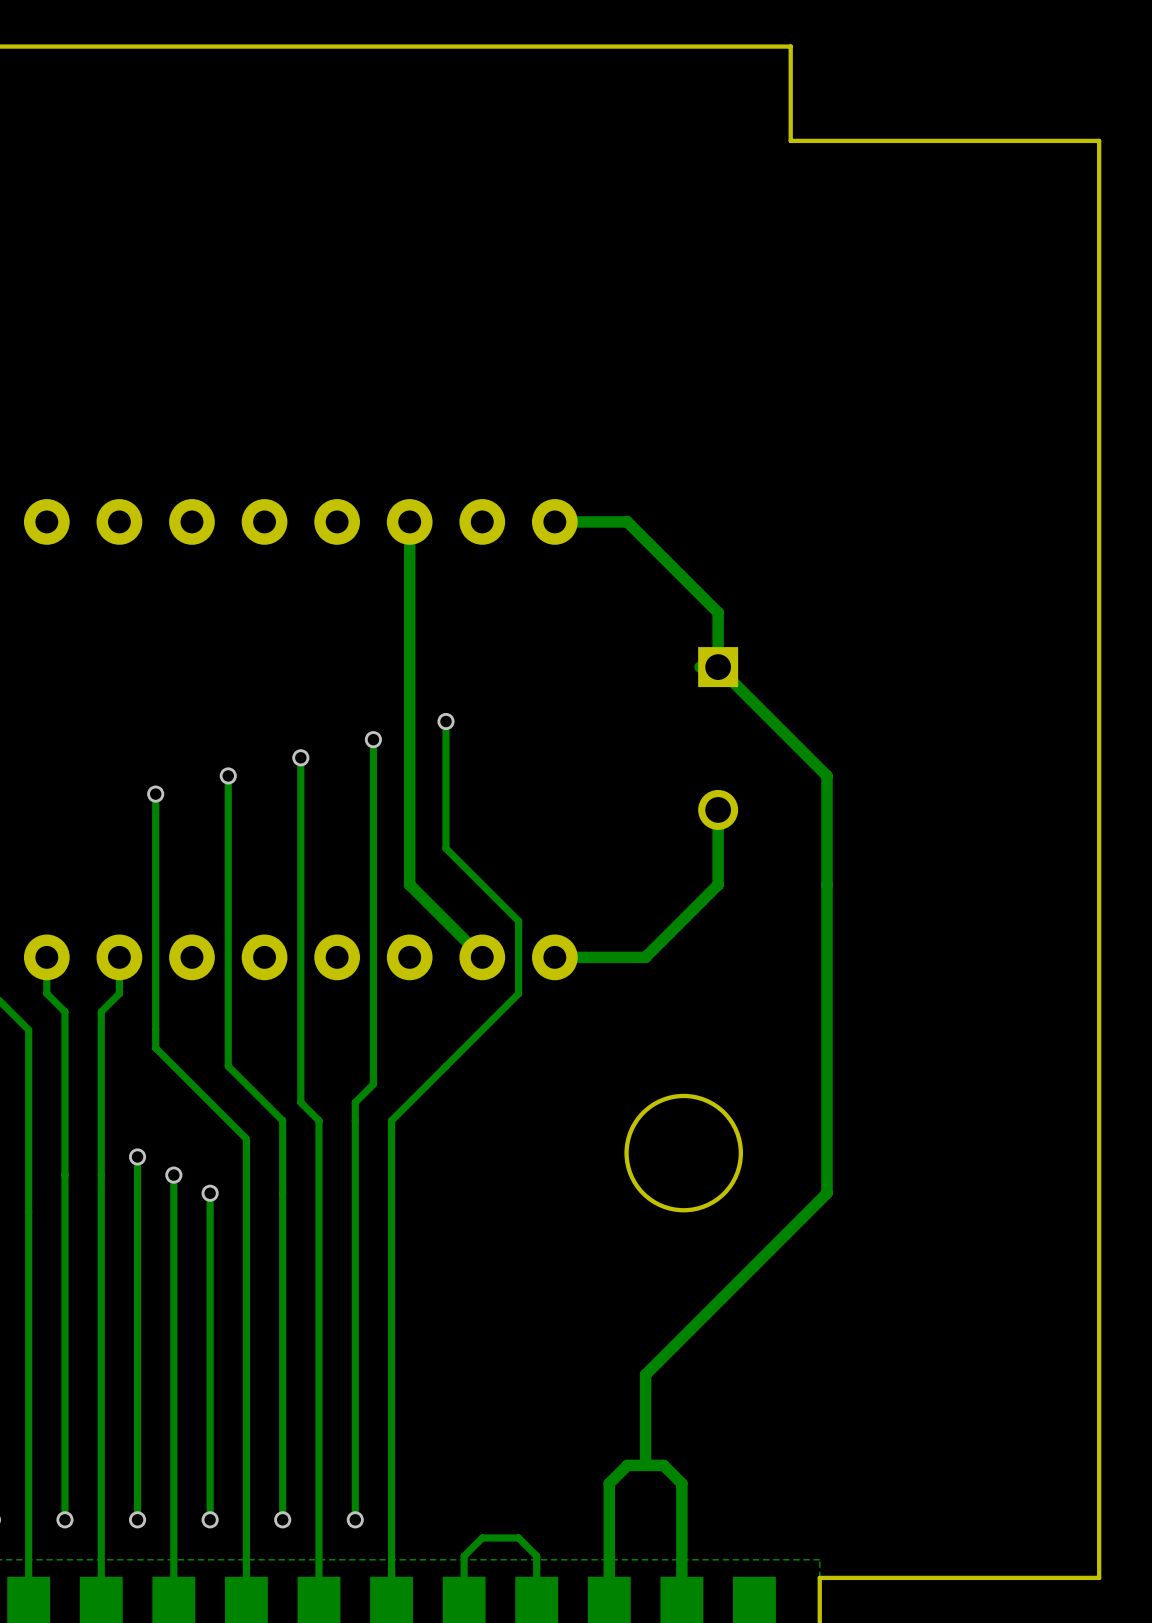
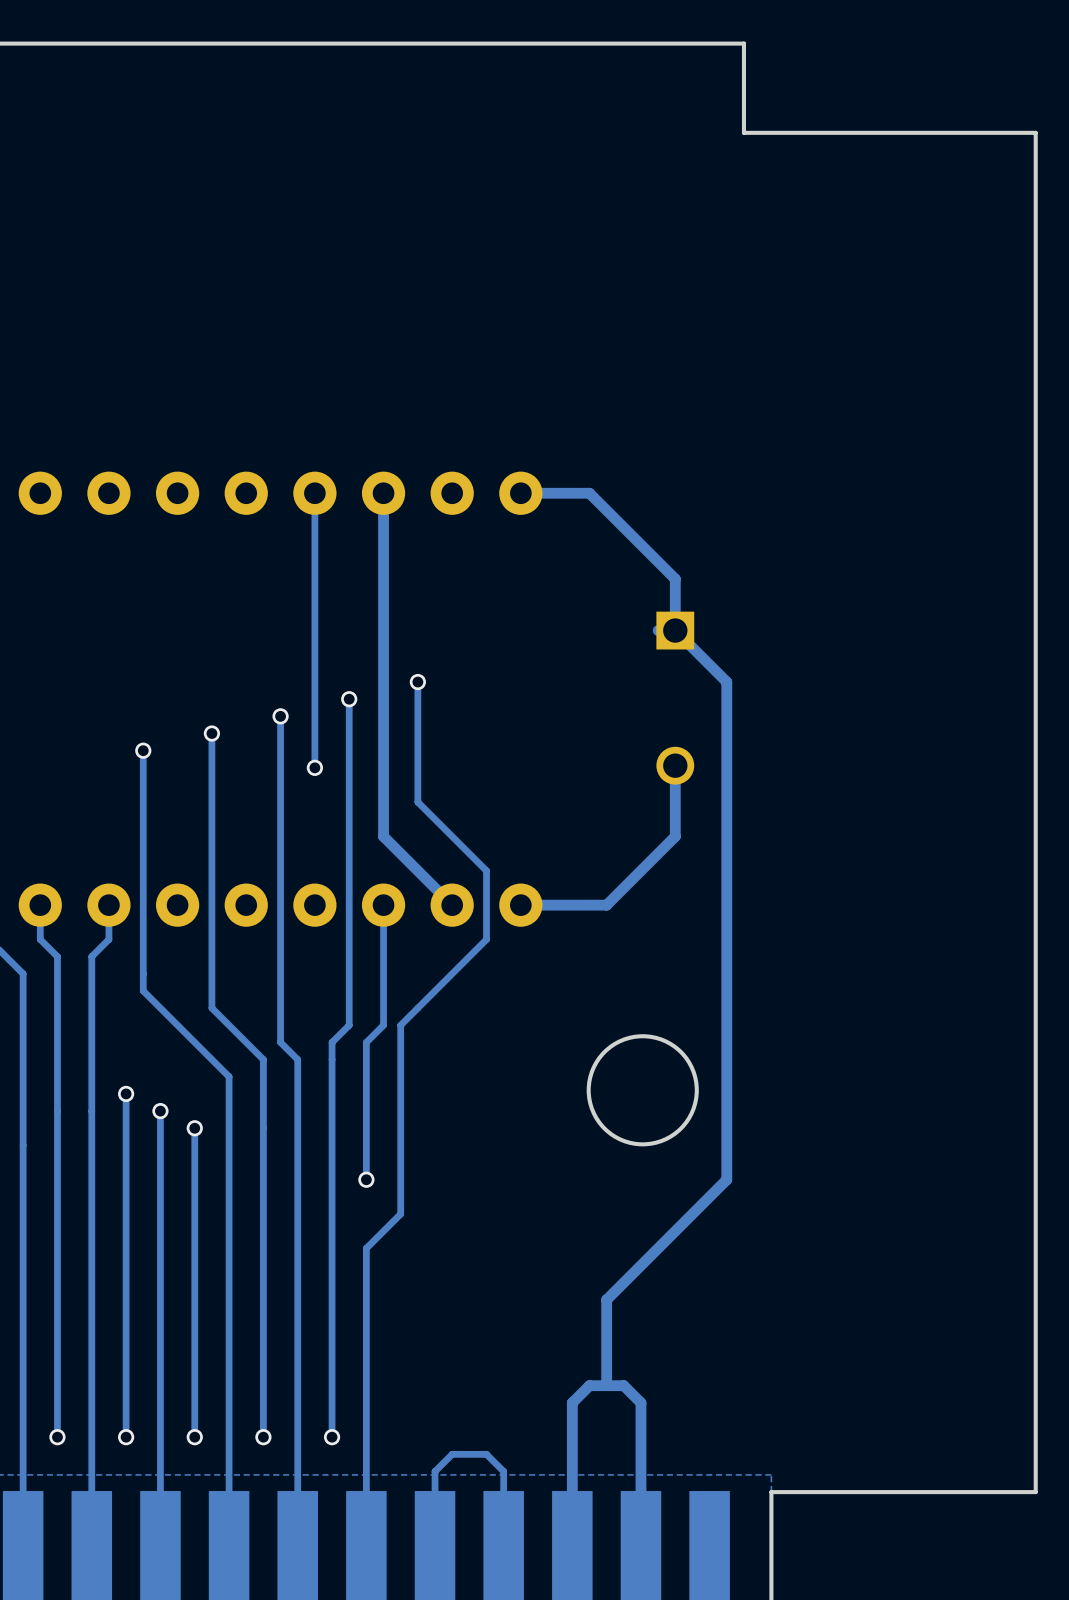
track: none -> (314, 493) (314, 767)
track: (772, 721) (827, 775) (827, 1193) (772, 1247) -> (726, 682) (726, 1179)
via: none -> (314, 767)
track: (427, 1084) (391, 1120) -> (383, 905) (383, 1025) (366, 1042) (366, 1059)
track: (391, 1247) (391, 1320) -> (400, 1025) (400, 1214) (366, 1248)
via: none -> (366, 1179)

